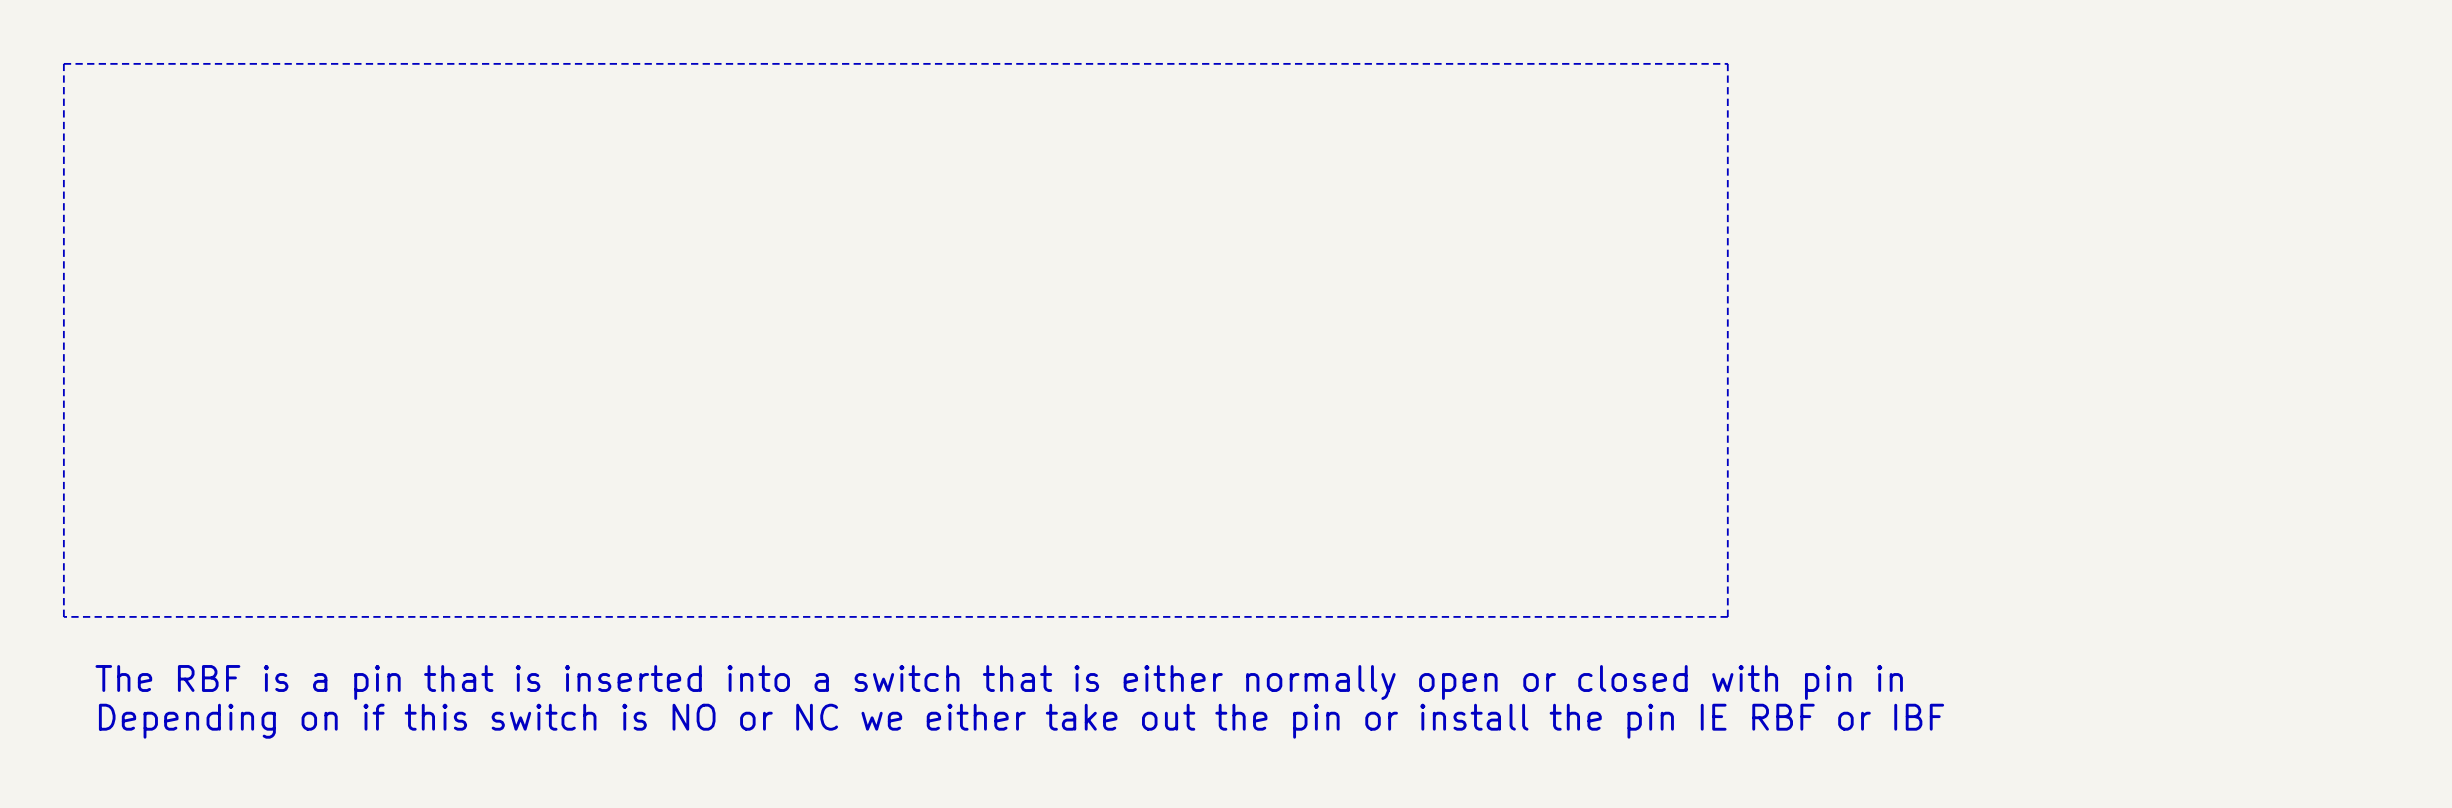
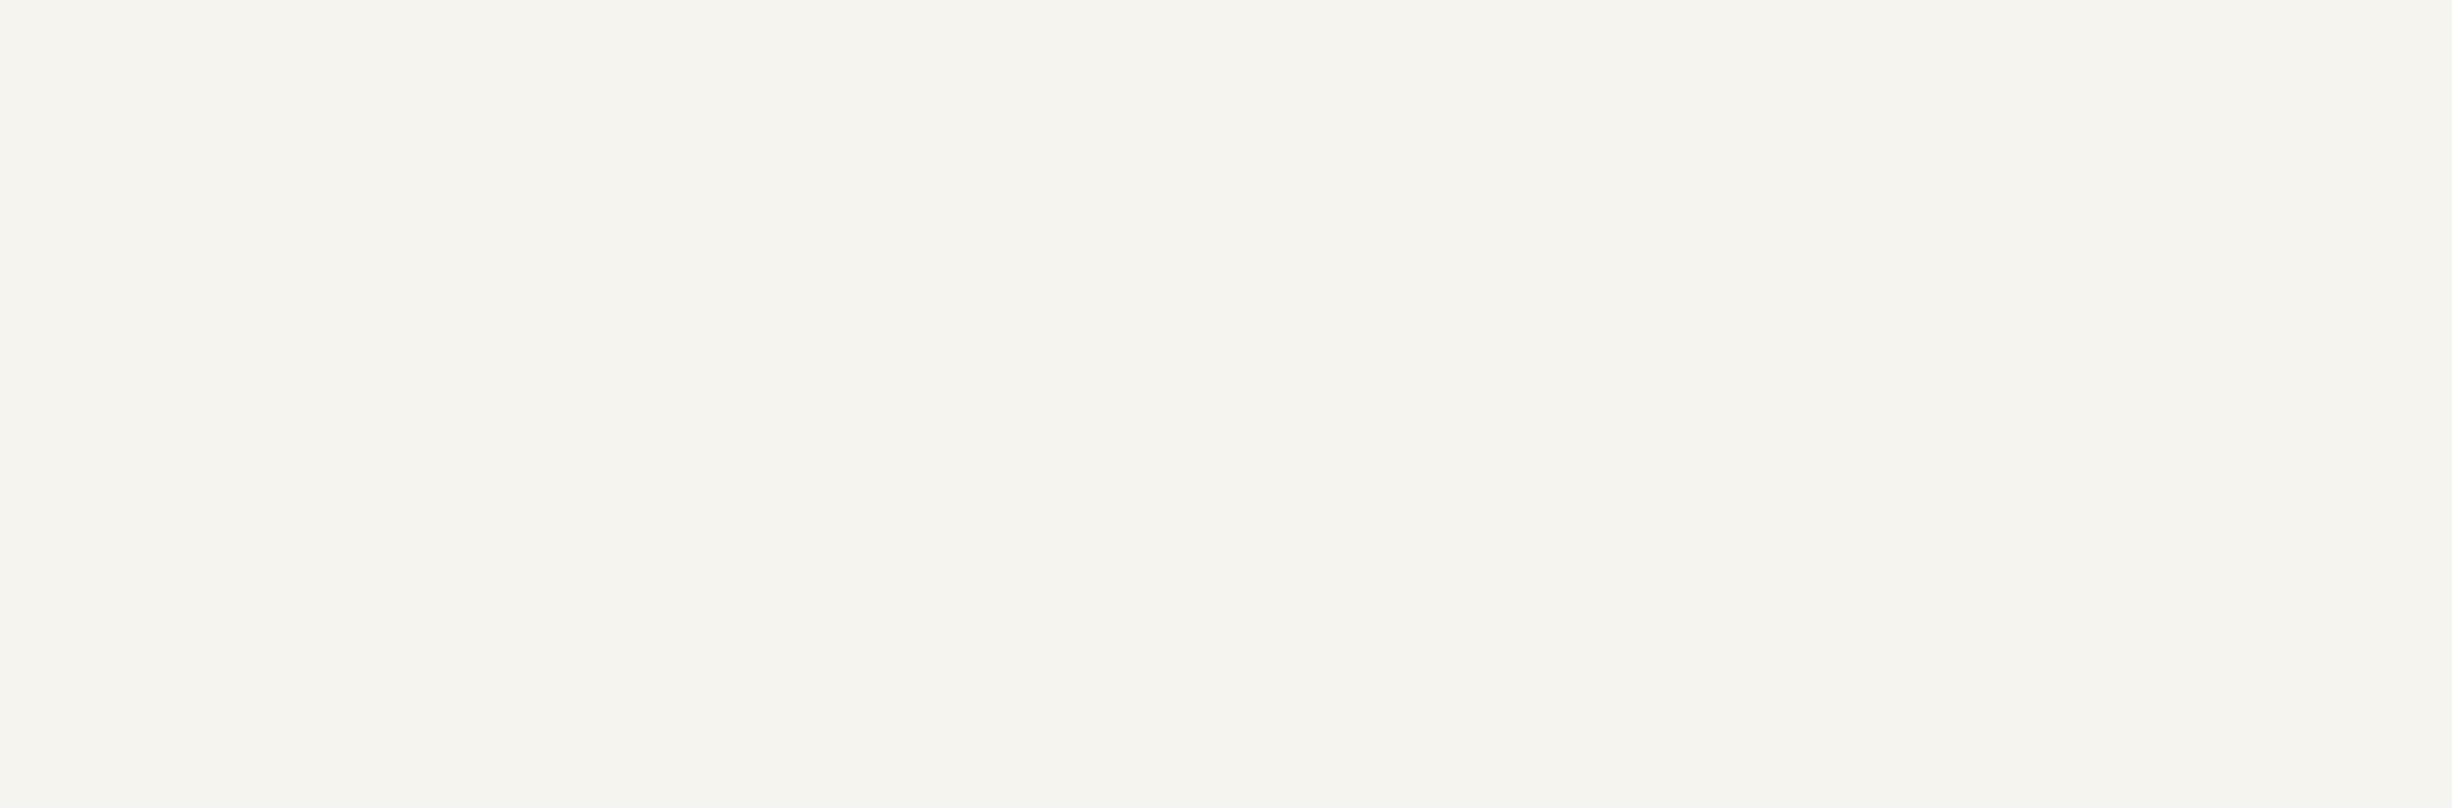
line: (63, 63) (1727, 63) (1727, 616) (63, 616) (63, 63) -> none
text: The RBF is a pin that is inserted into a switch that is either normally open or closed with pin in (999, 682) -> none
text: Depending on if this switch is NO or NC we either take out the pin or install the pin IE RBF or IBF (1021, 721) -> none

